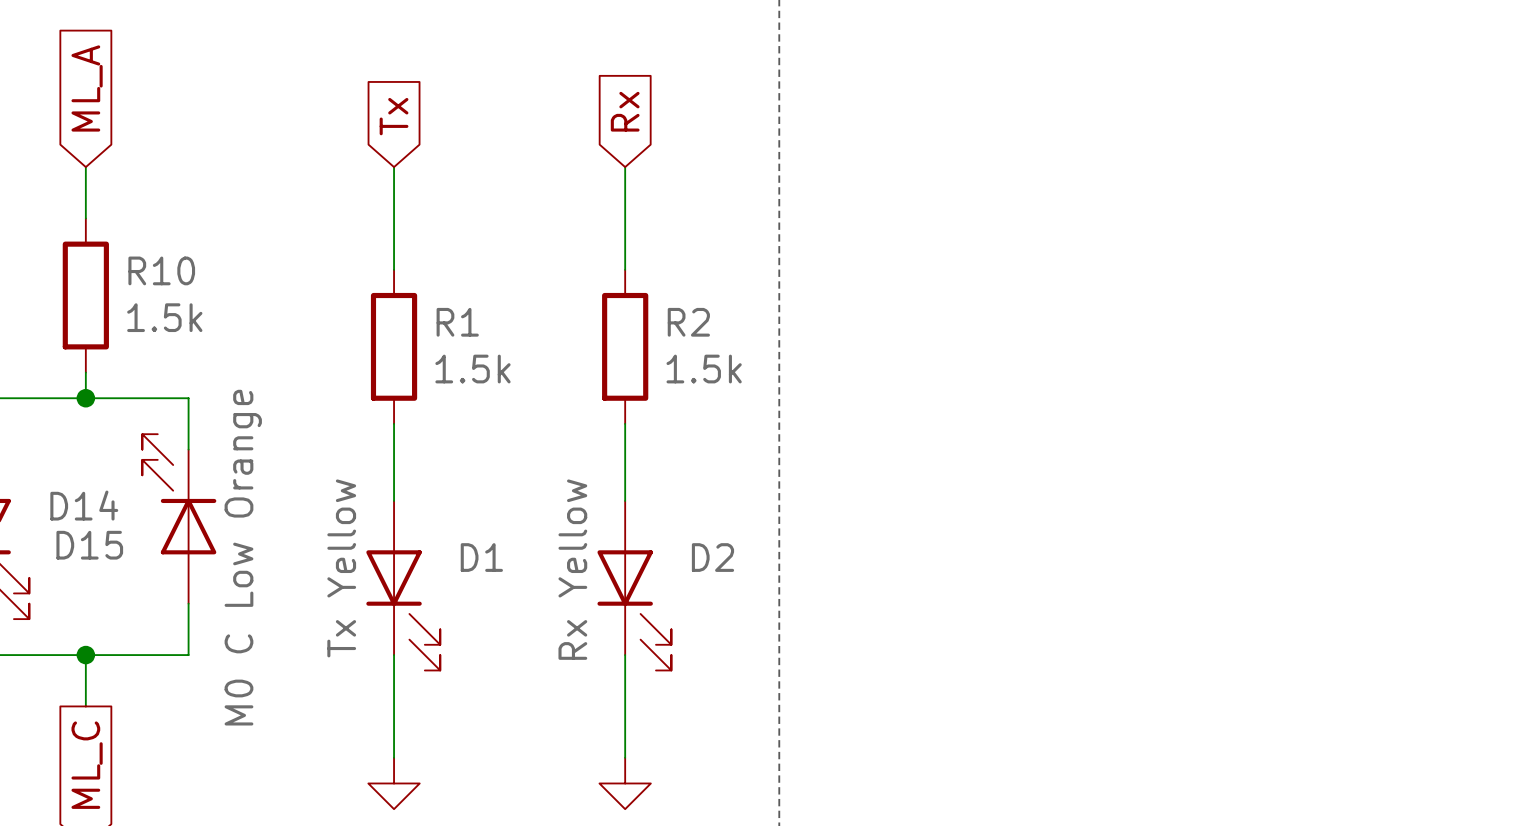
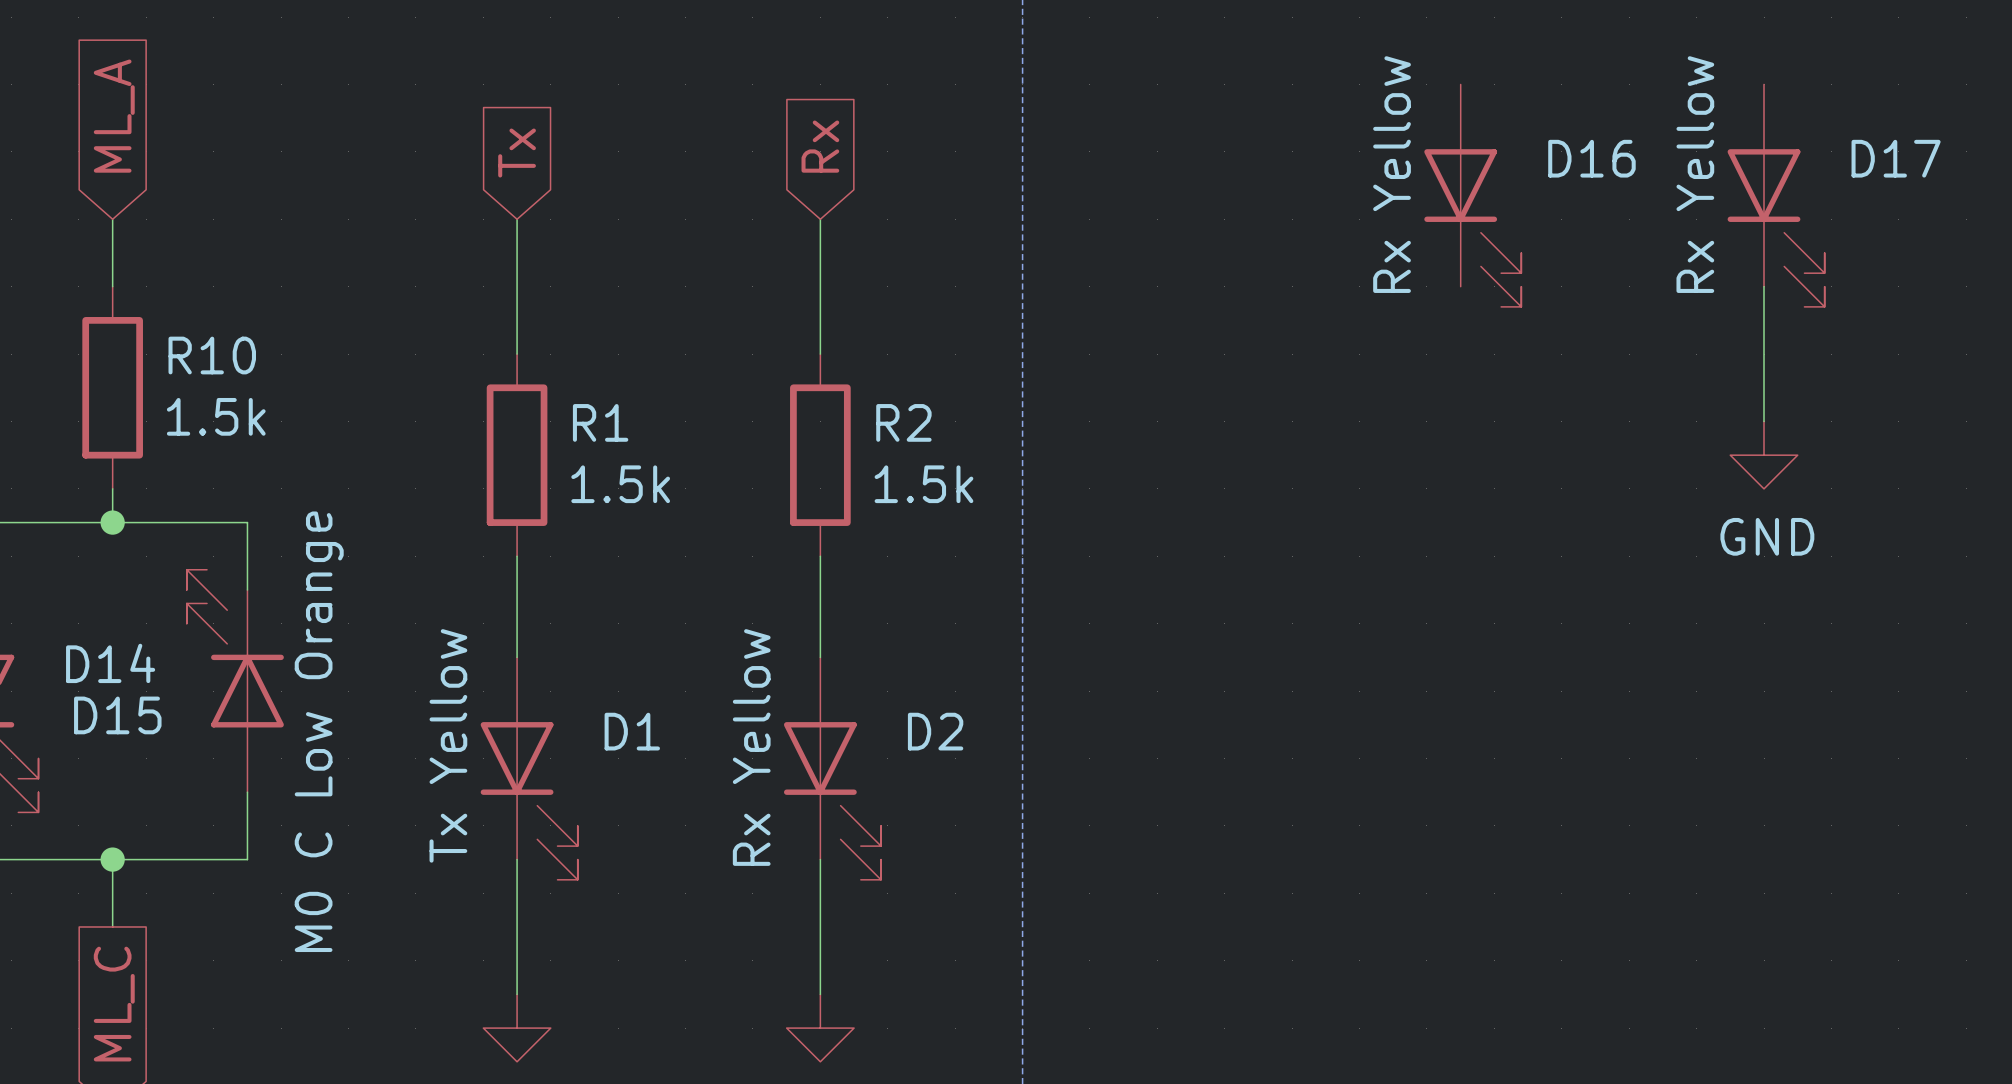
D16: none -> Rx Yellow (1472, 195)
D17: none -> Rx Yellow (1776, 195)
wire: none -> (1764, 286) (1764, 421)
power symbol: none -> GND (1764, 455)

